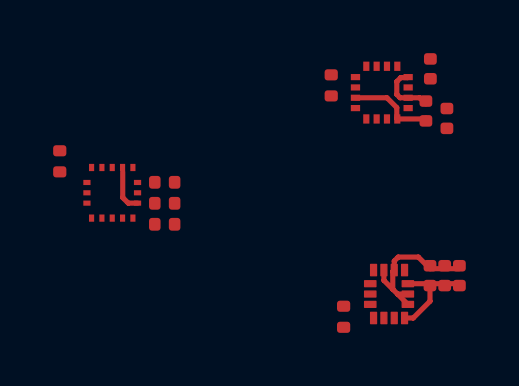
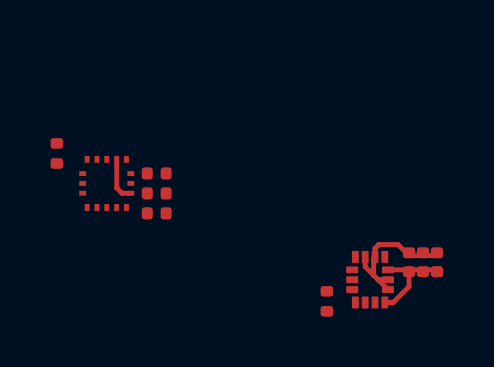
part: (430, 68) -> none
top track: (408, 77) (400, 77) (396, 81) (396, 94) (400, 97) (419, 97) (425, 104) -> none
part: (331, 85) -> none
part: (381, 92) -> none
top track: (355, 97) (386, 97) (396, 107) (397, 118) (425, 117) -> none
part: (425, 110) -> none
part: (446, 118) -> none

